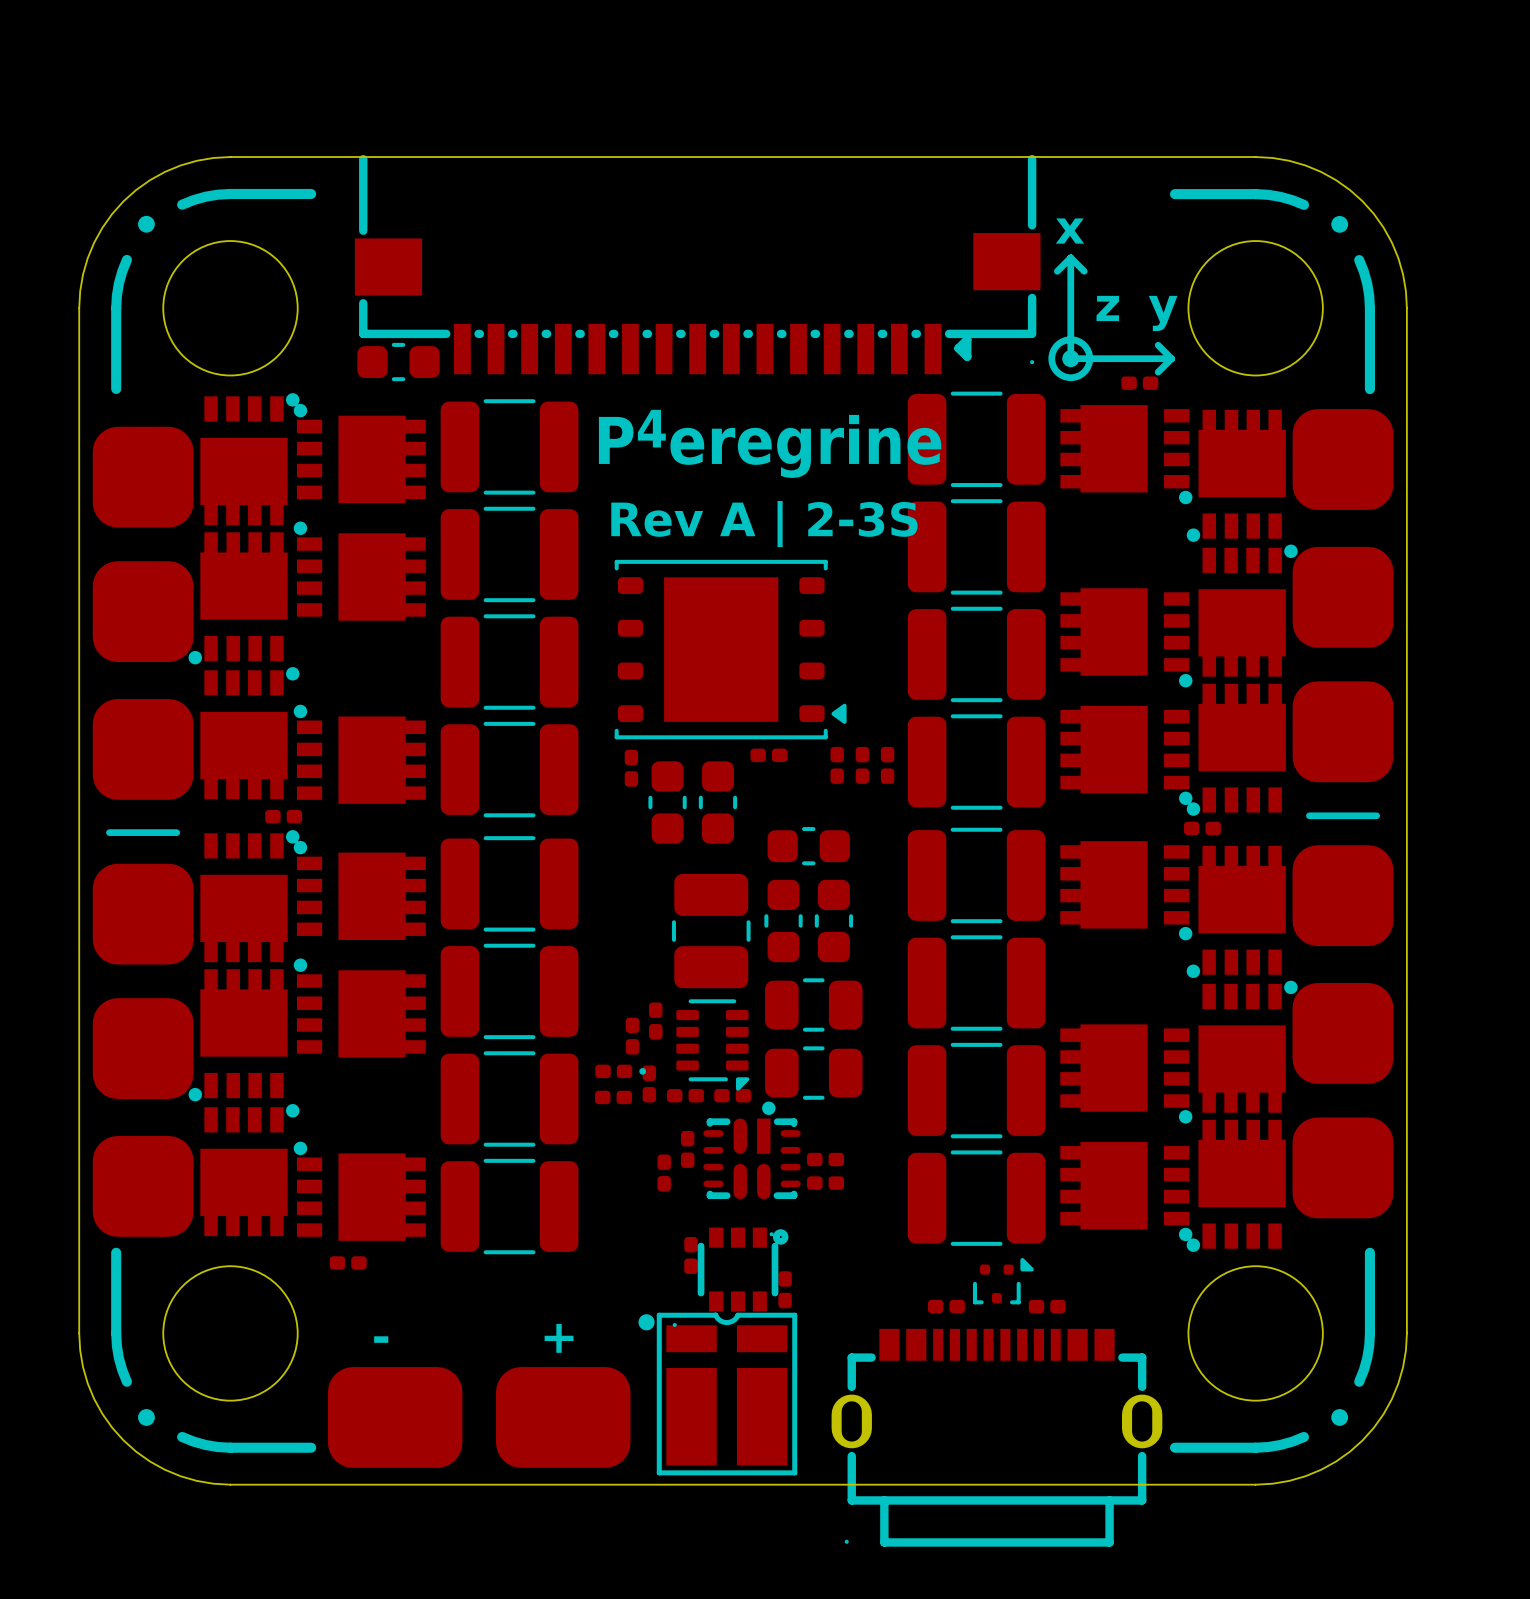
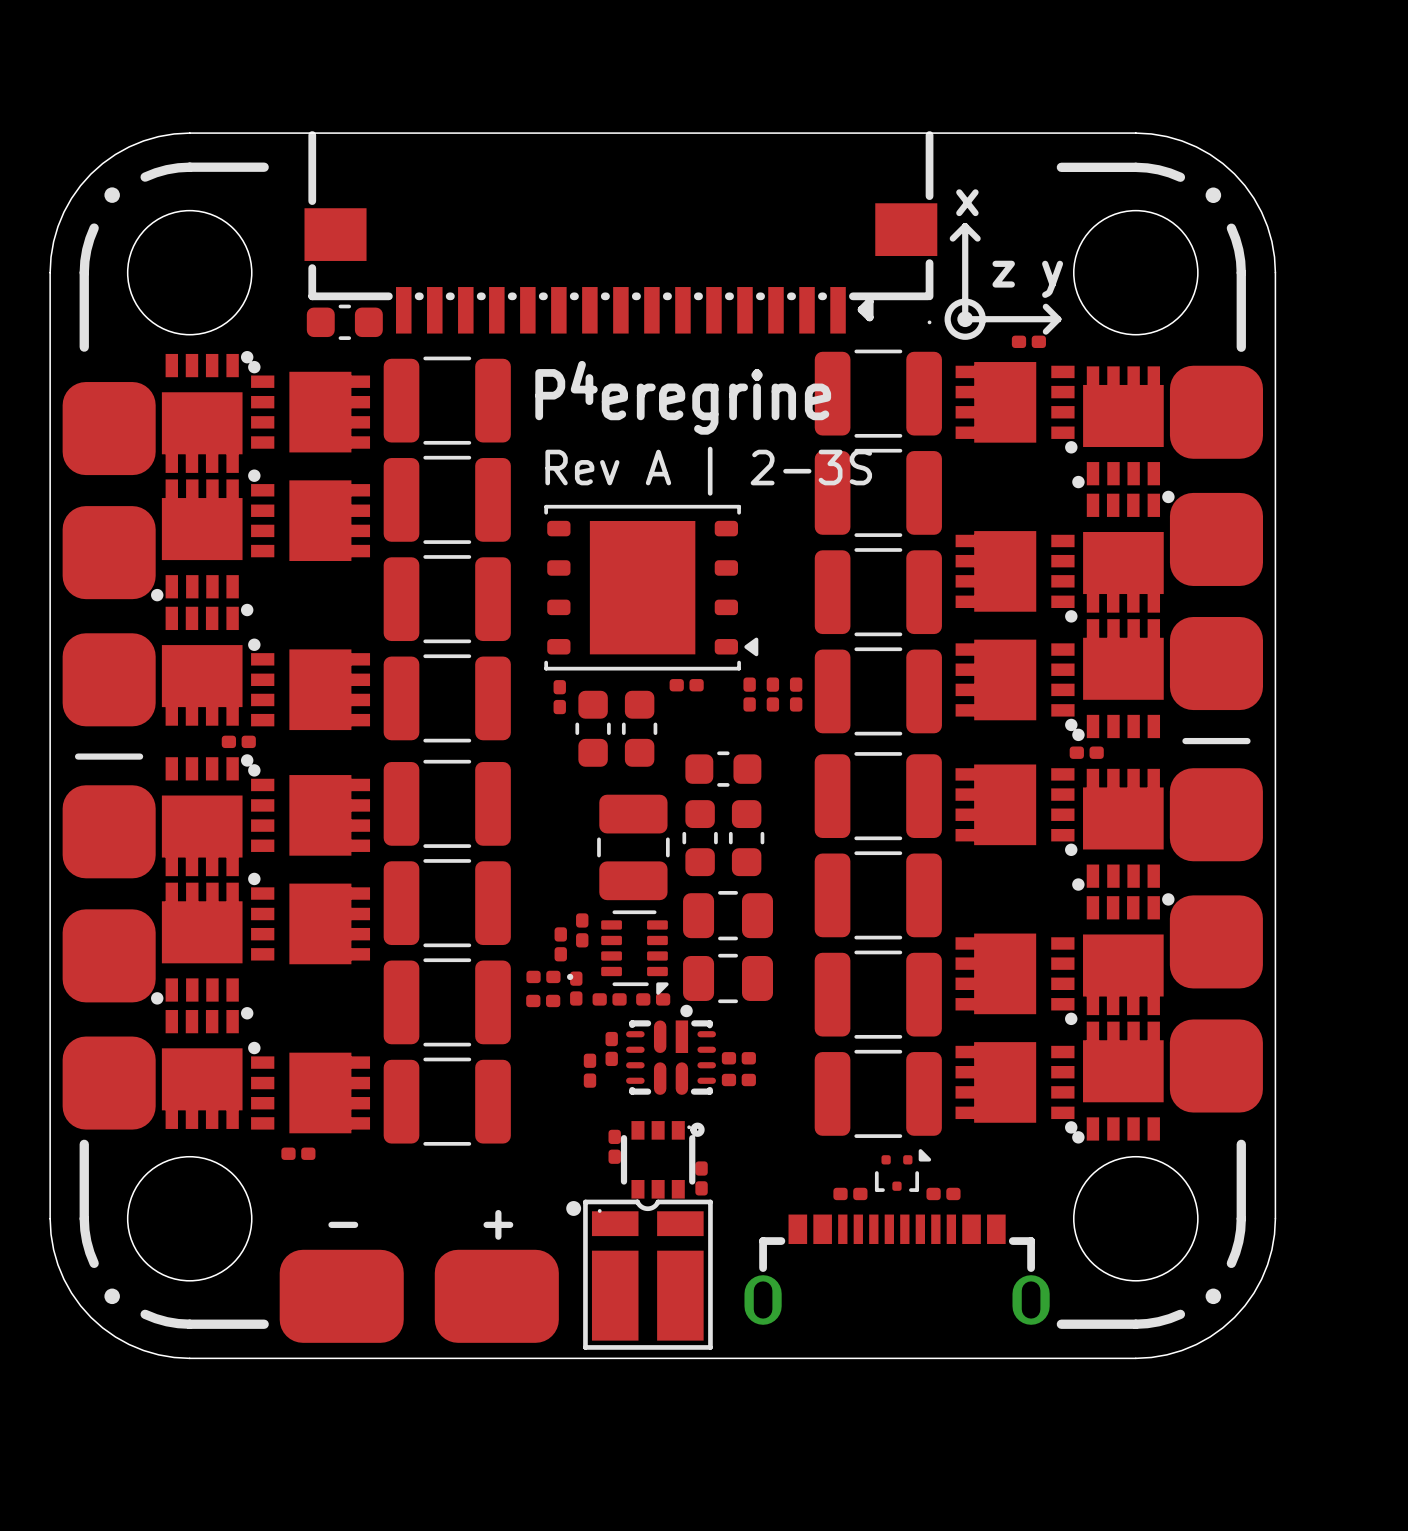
part: (996, 1437) -> none

